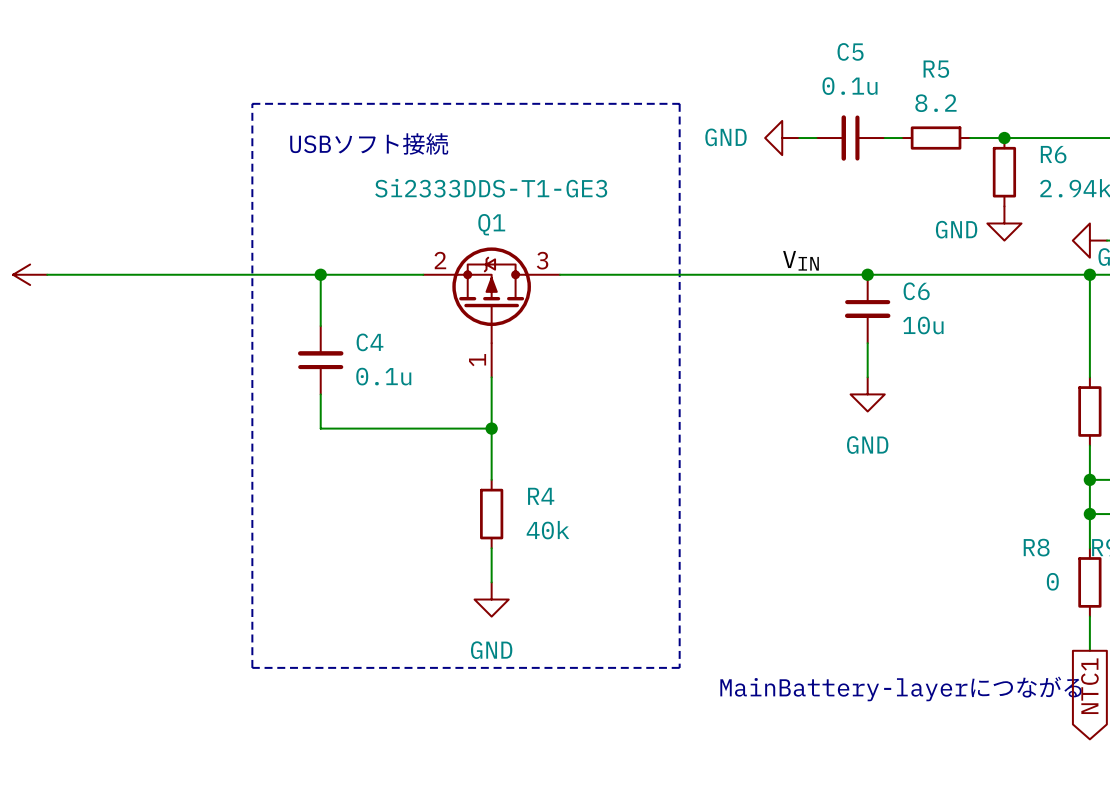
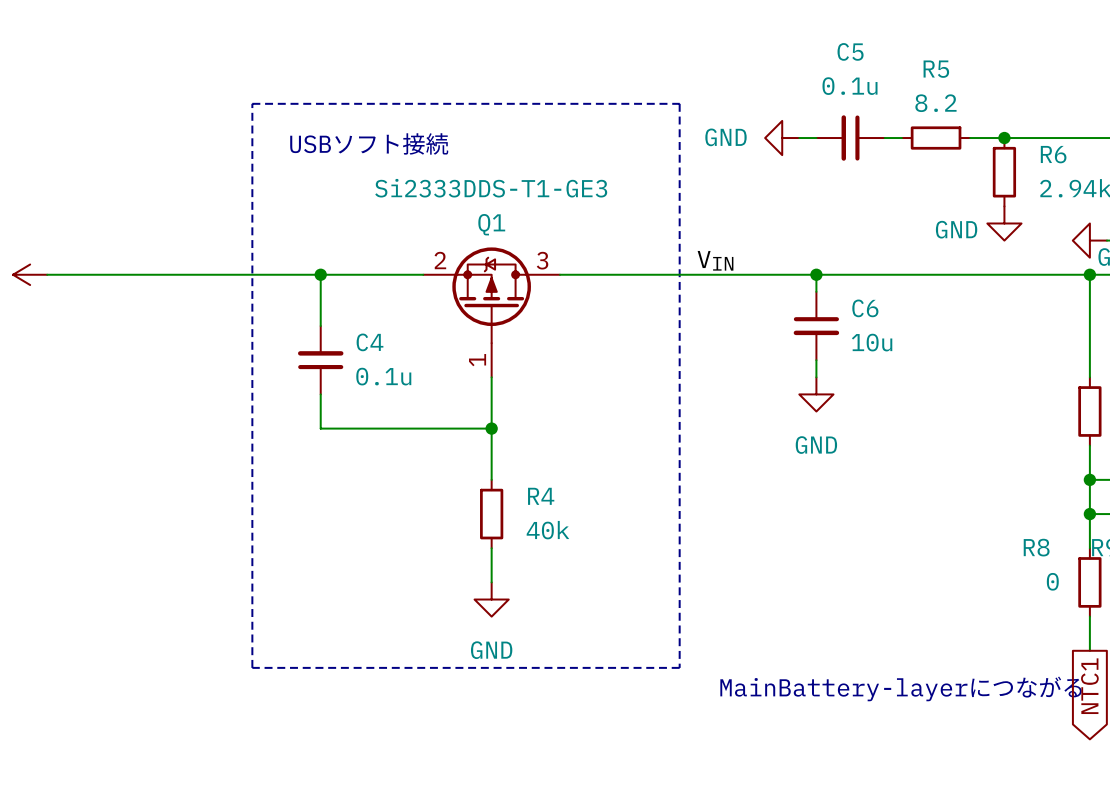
label position: VIN (800, 260) -> VIN (715, 260)
wire: none -> (816, 274) (816, 291)
junction position: (867, 274) -> (816, 274)
C6 position: (867, 308) -> (816, 326)
wire: (867, 343) (867, 377) -> none
wire: none -> (816, 360) (816, 377)
power symbol position: GND (867, 394) -> GND (816, 394)

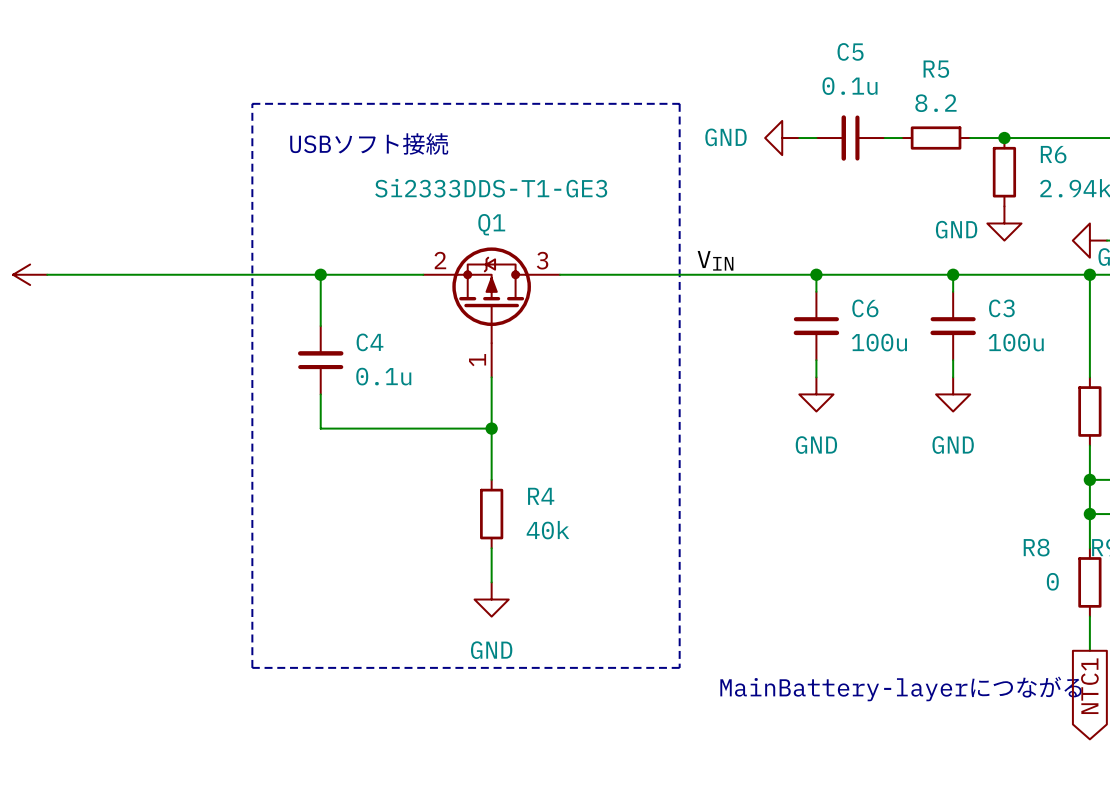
wire: none -> (953, 274) (953, 291)
junction: none -> (953, 274)
C3: none -> 100u (953, 326)
C6 value: 10u (872, 342) -> 100u (879, 342)
wire: none -> (953, 360) (953, 377)
power symbol: none -> GND (953, 394)

